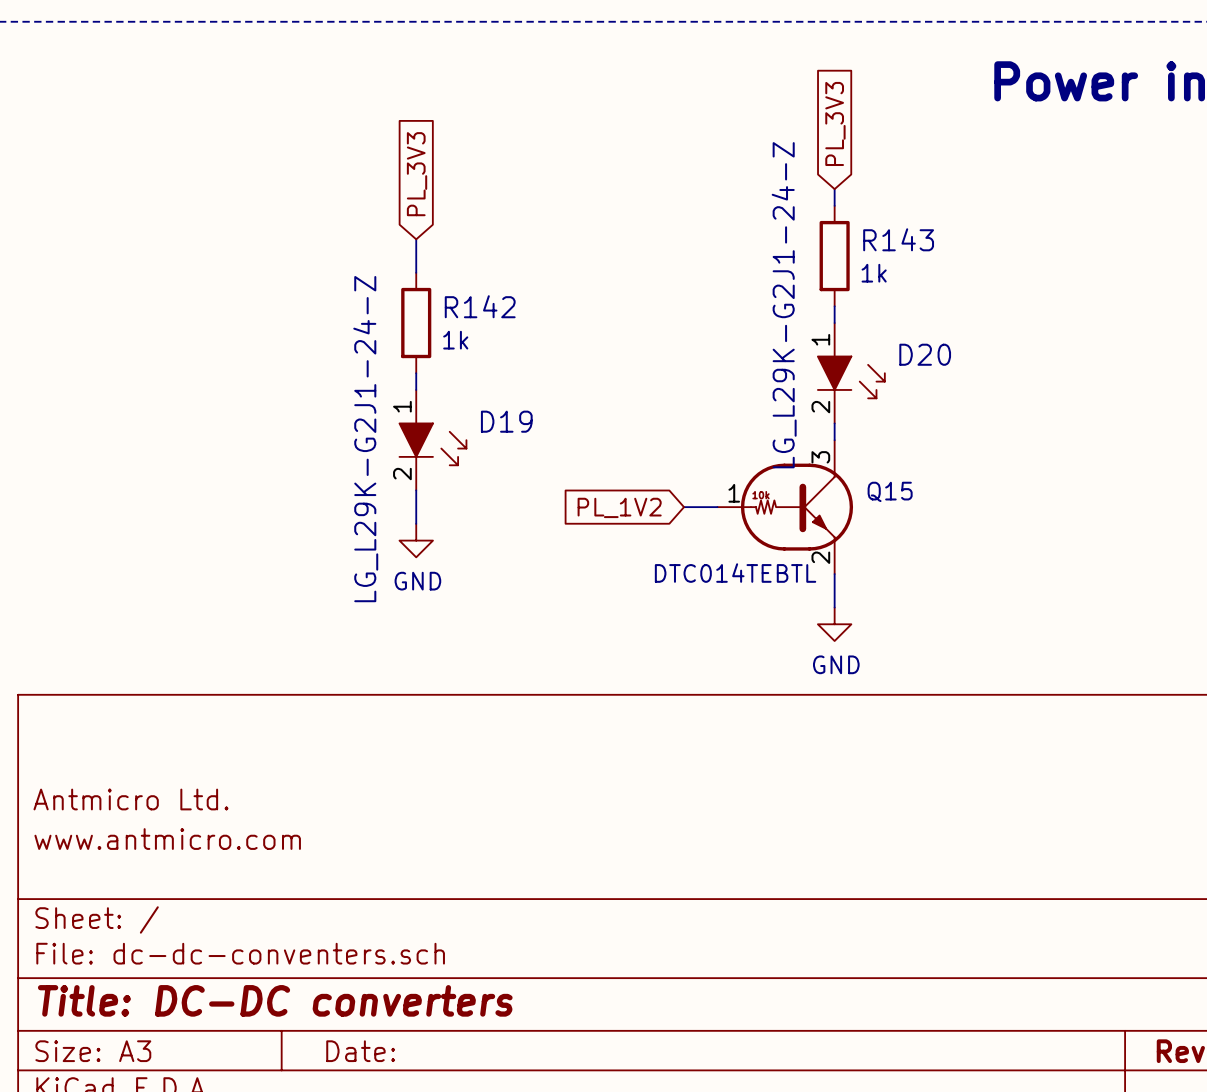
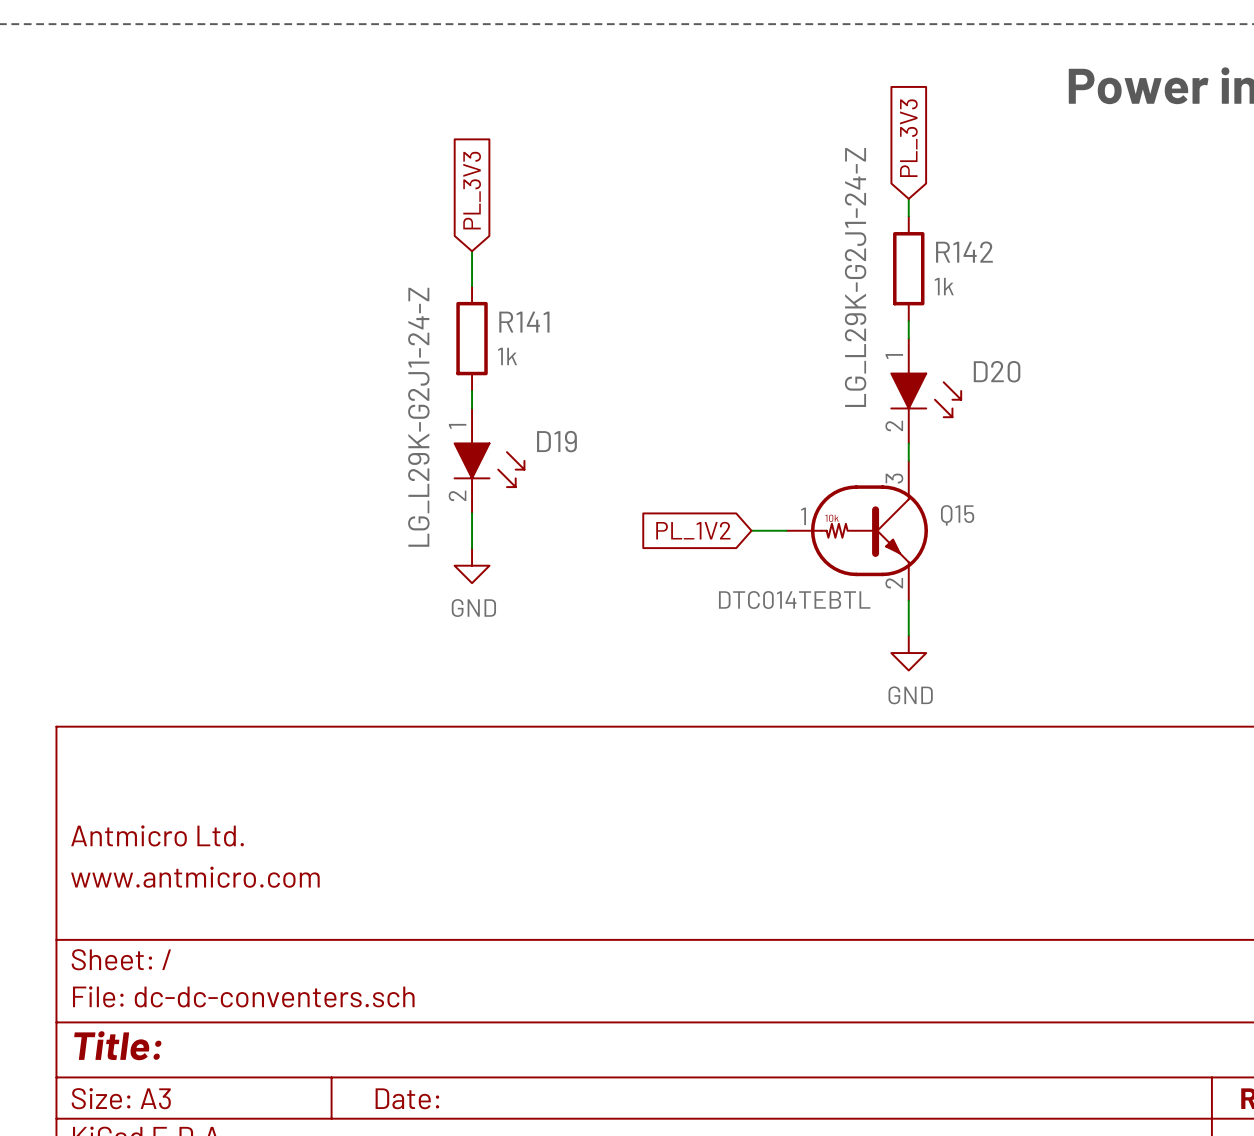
R143 name: R143 (898, 239) -> R142 (964, 252)
R142 name: R142 (480, 306) -> R141 (524, 322)
title block: Title: DC-DC converters (275, 1000) -> Title: (117, 1045)

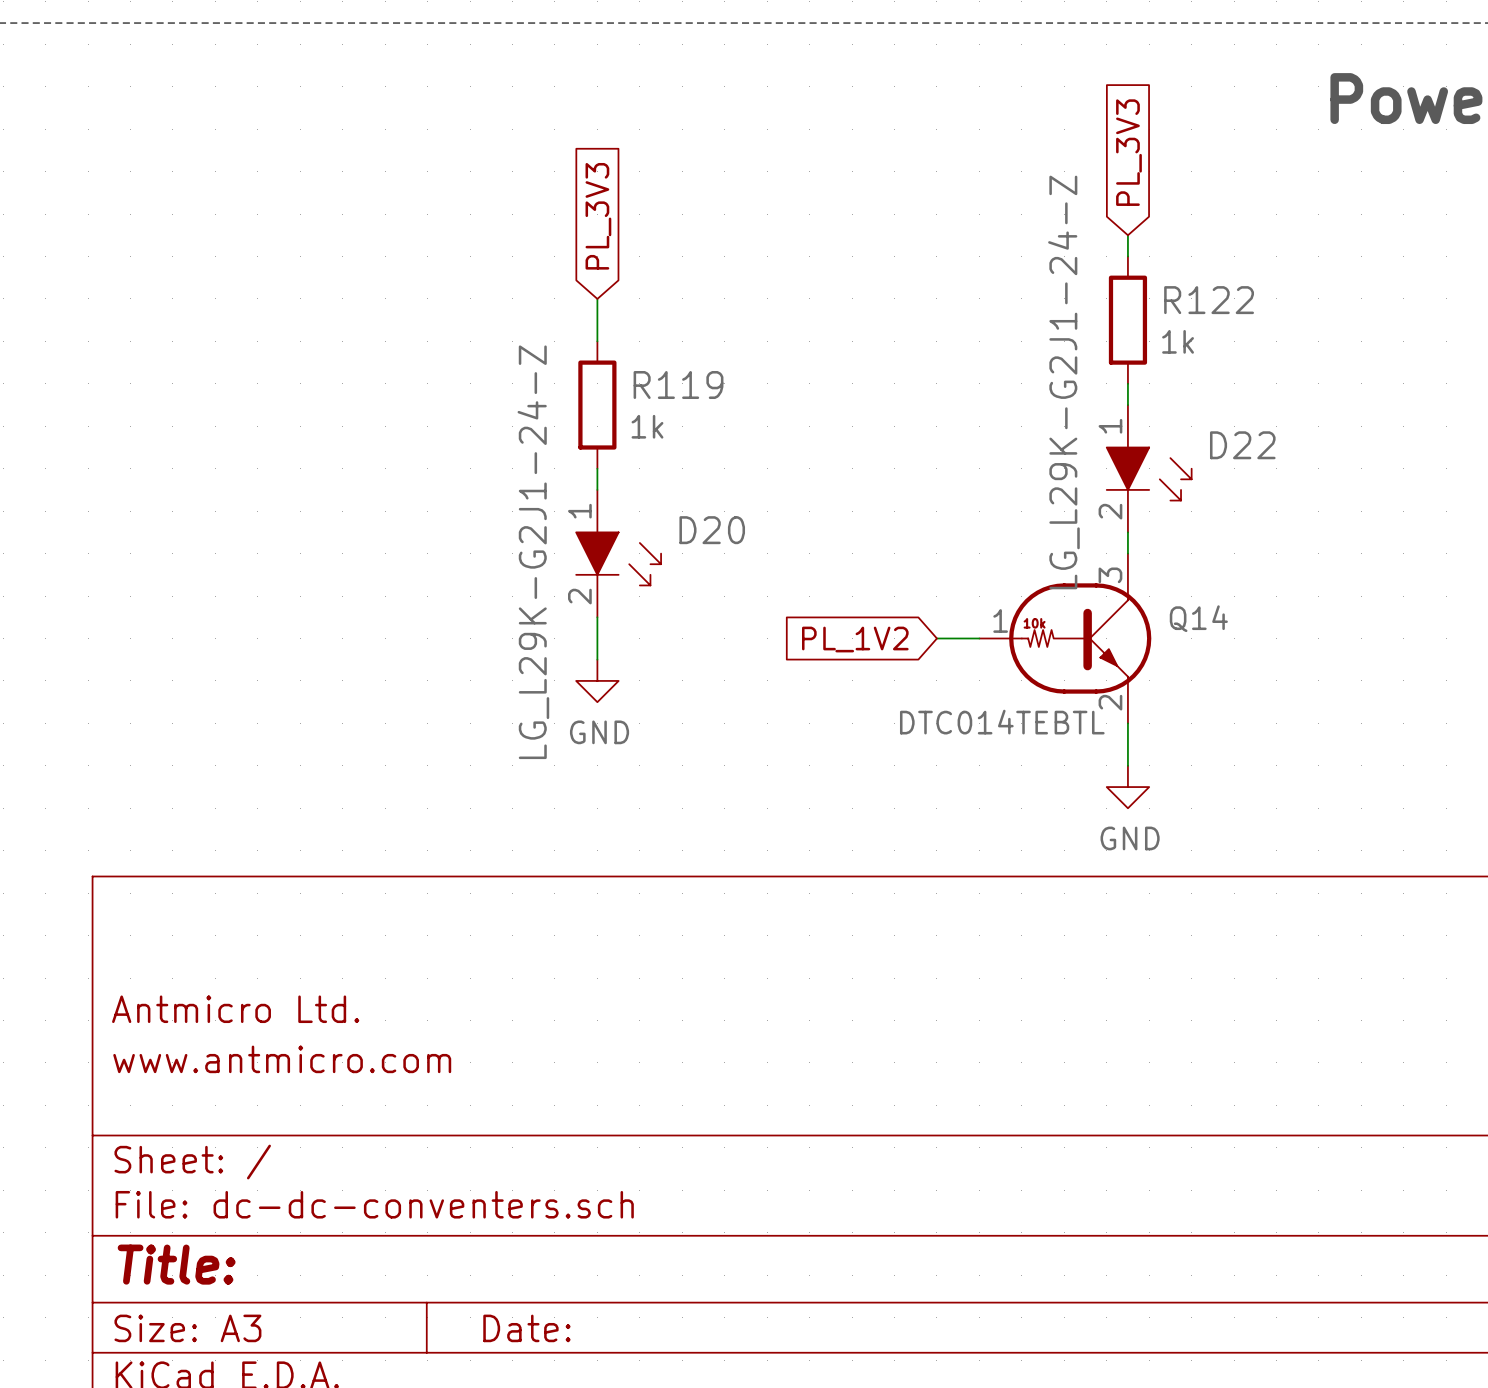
R142 name: R142 (964, 252) -> R122 (1209, 300)
R141 name: R141 (524, 322) -> R119 (678, 385)
D20 name: D20 (997, 371) -> D22 (1242, 445)
D19 name: D19 (556, 441) -> D20 (712, 530)
Q15 name: Q15 (957, 515) -> Q14 (1198, 618)

